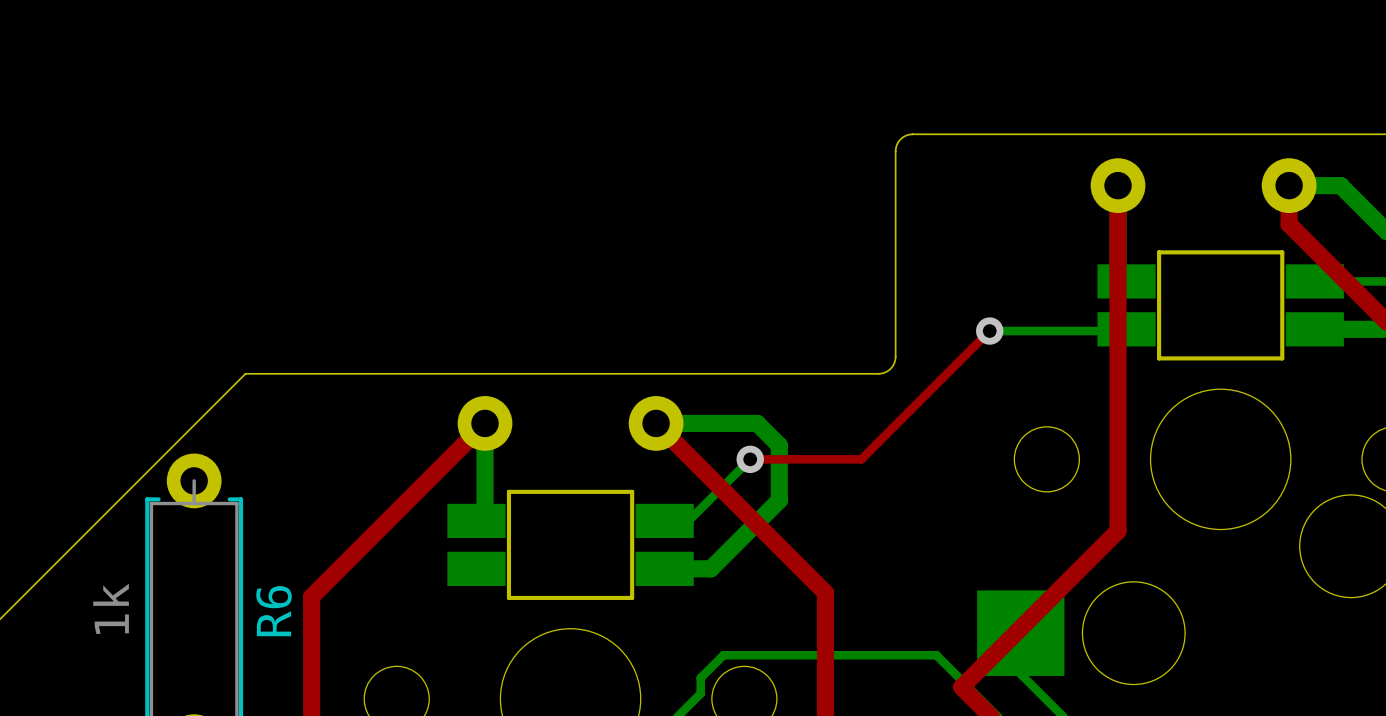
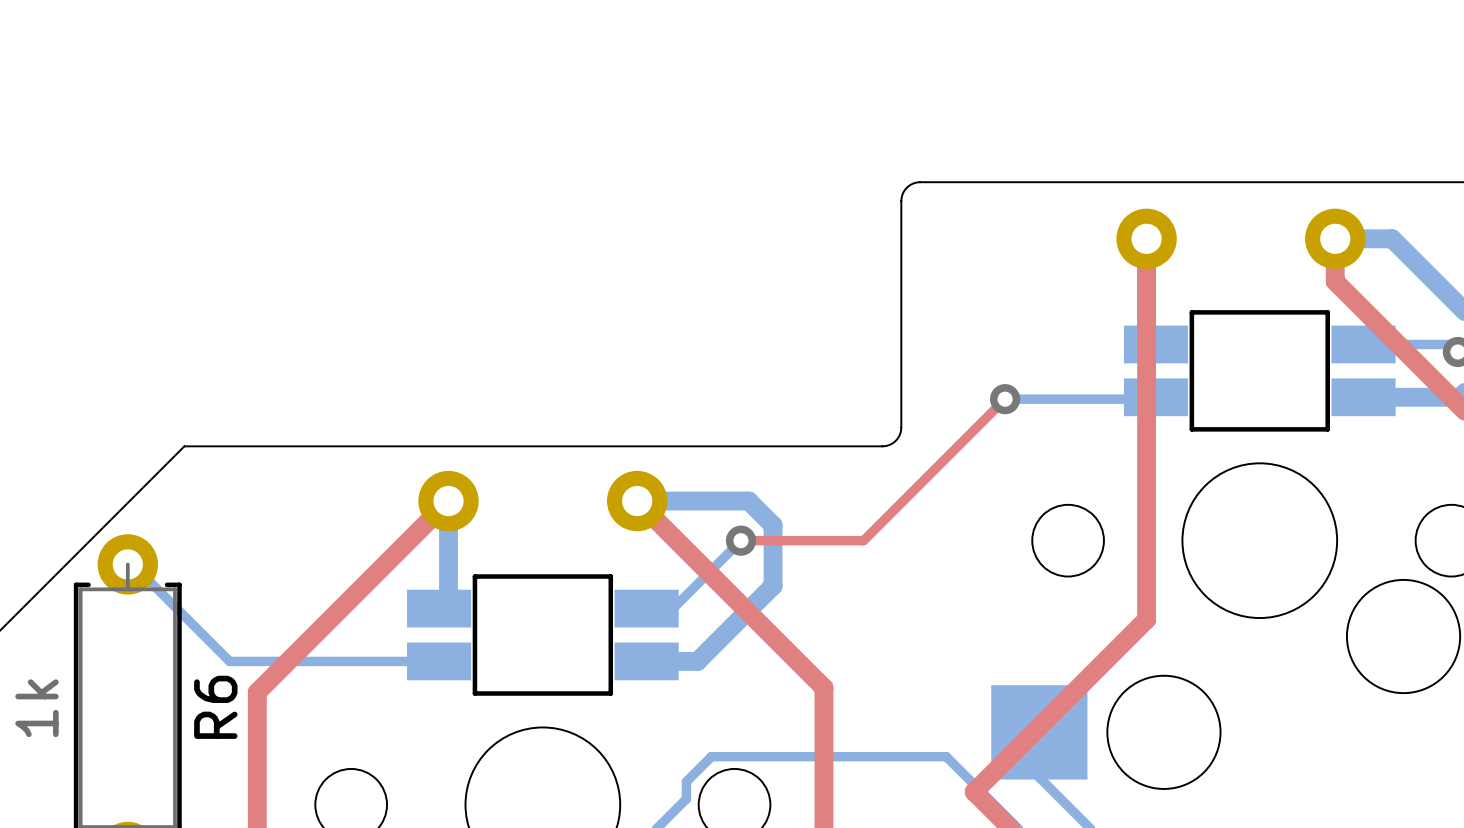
bottom track: none -> (127, 559) (229, 661) (439, 661)

